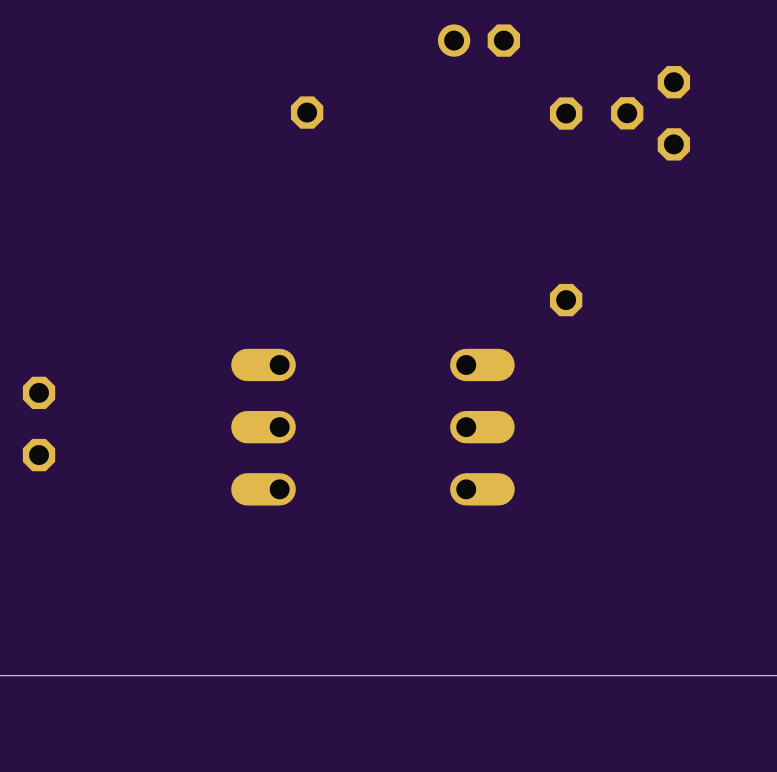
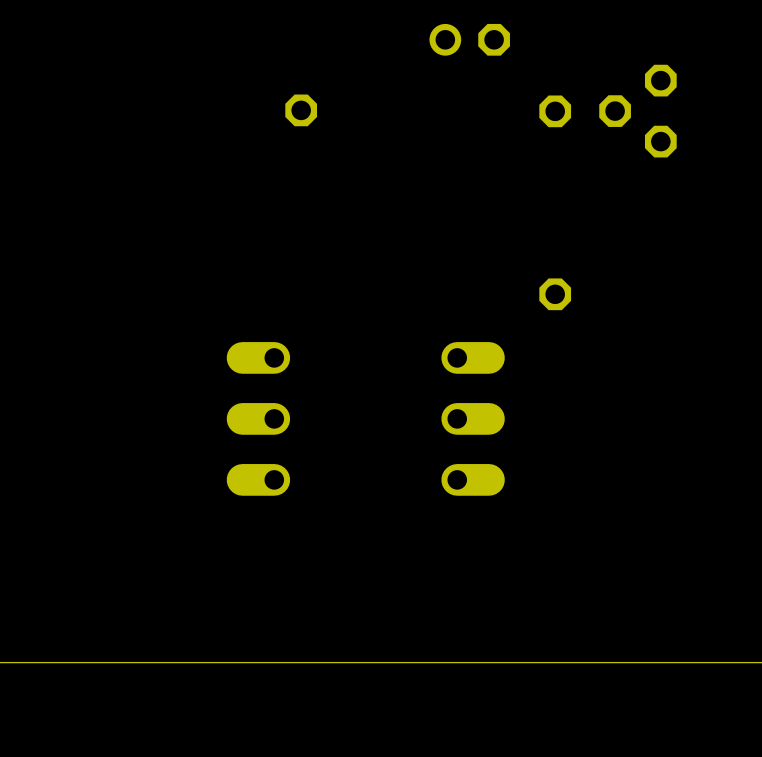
part: (39, 423) -> none

